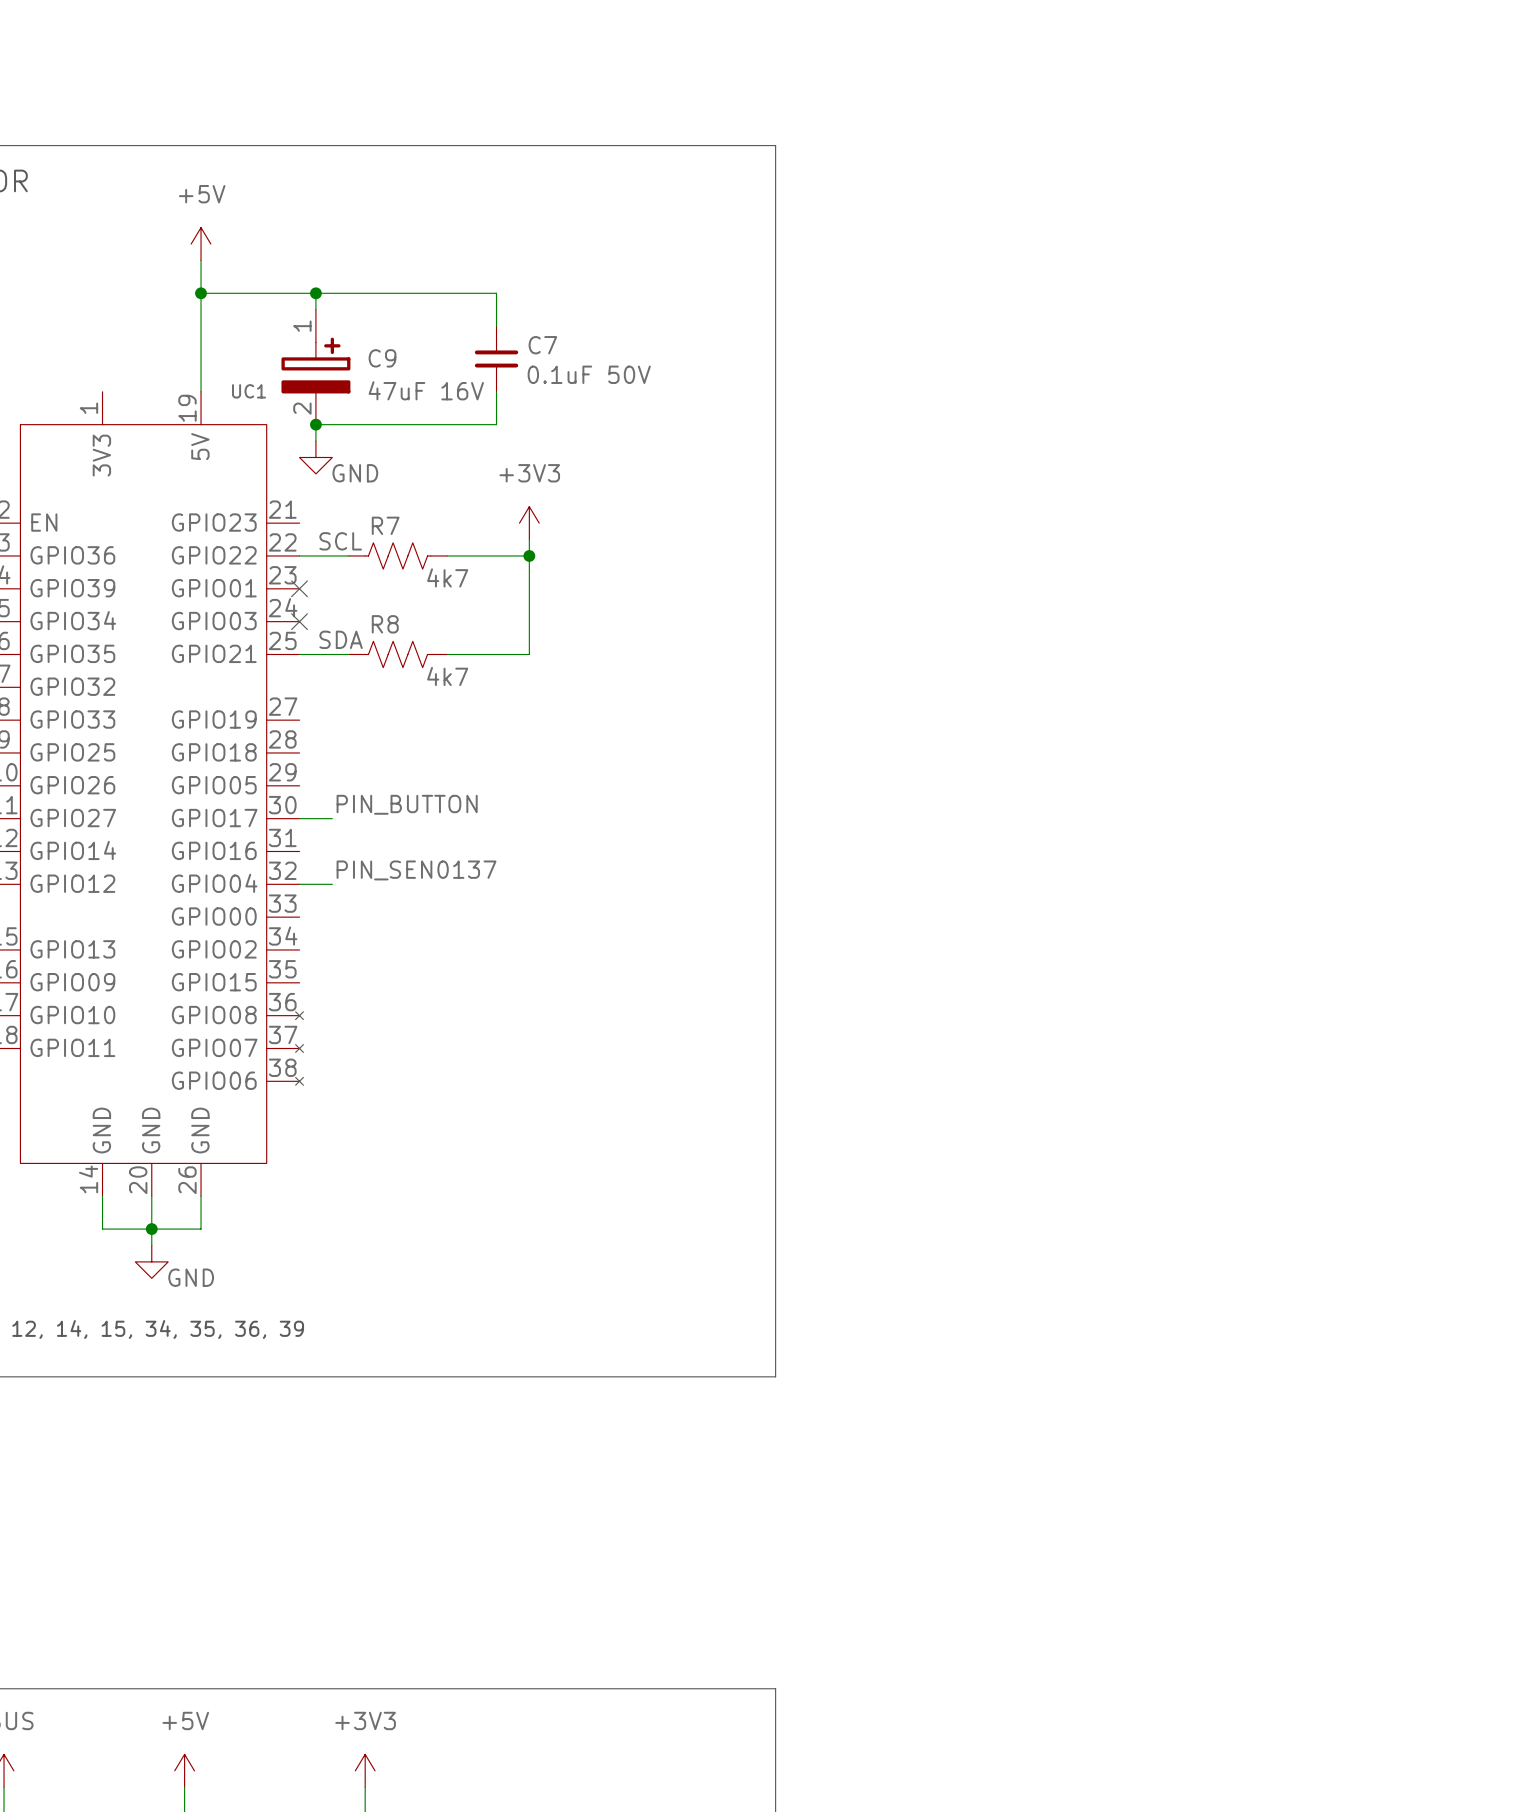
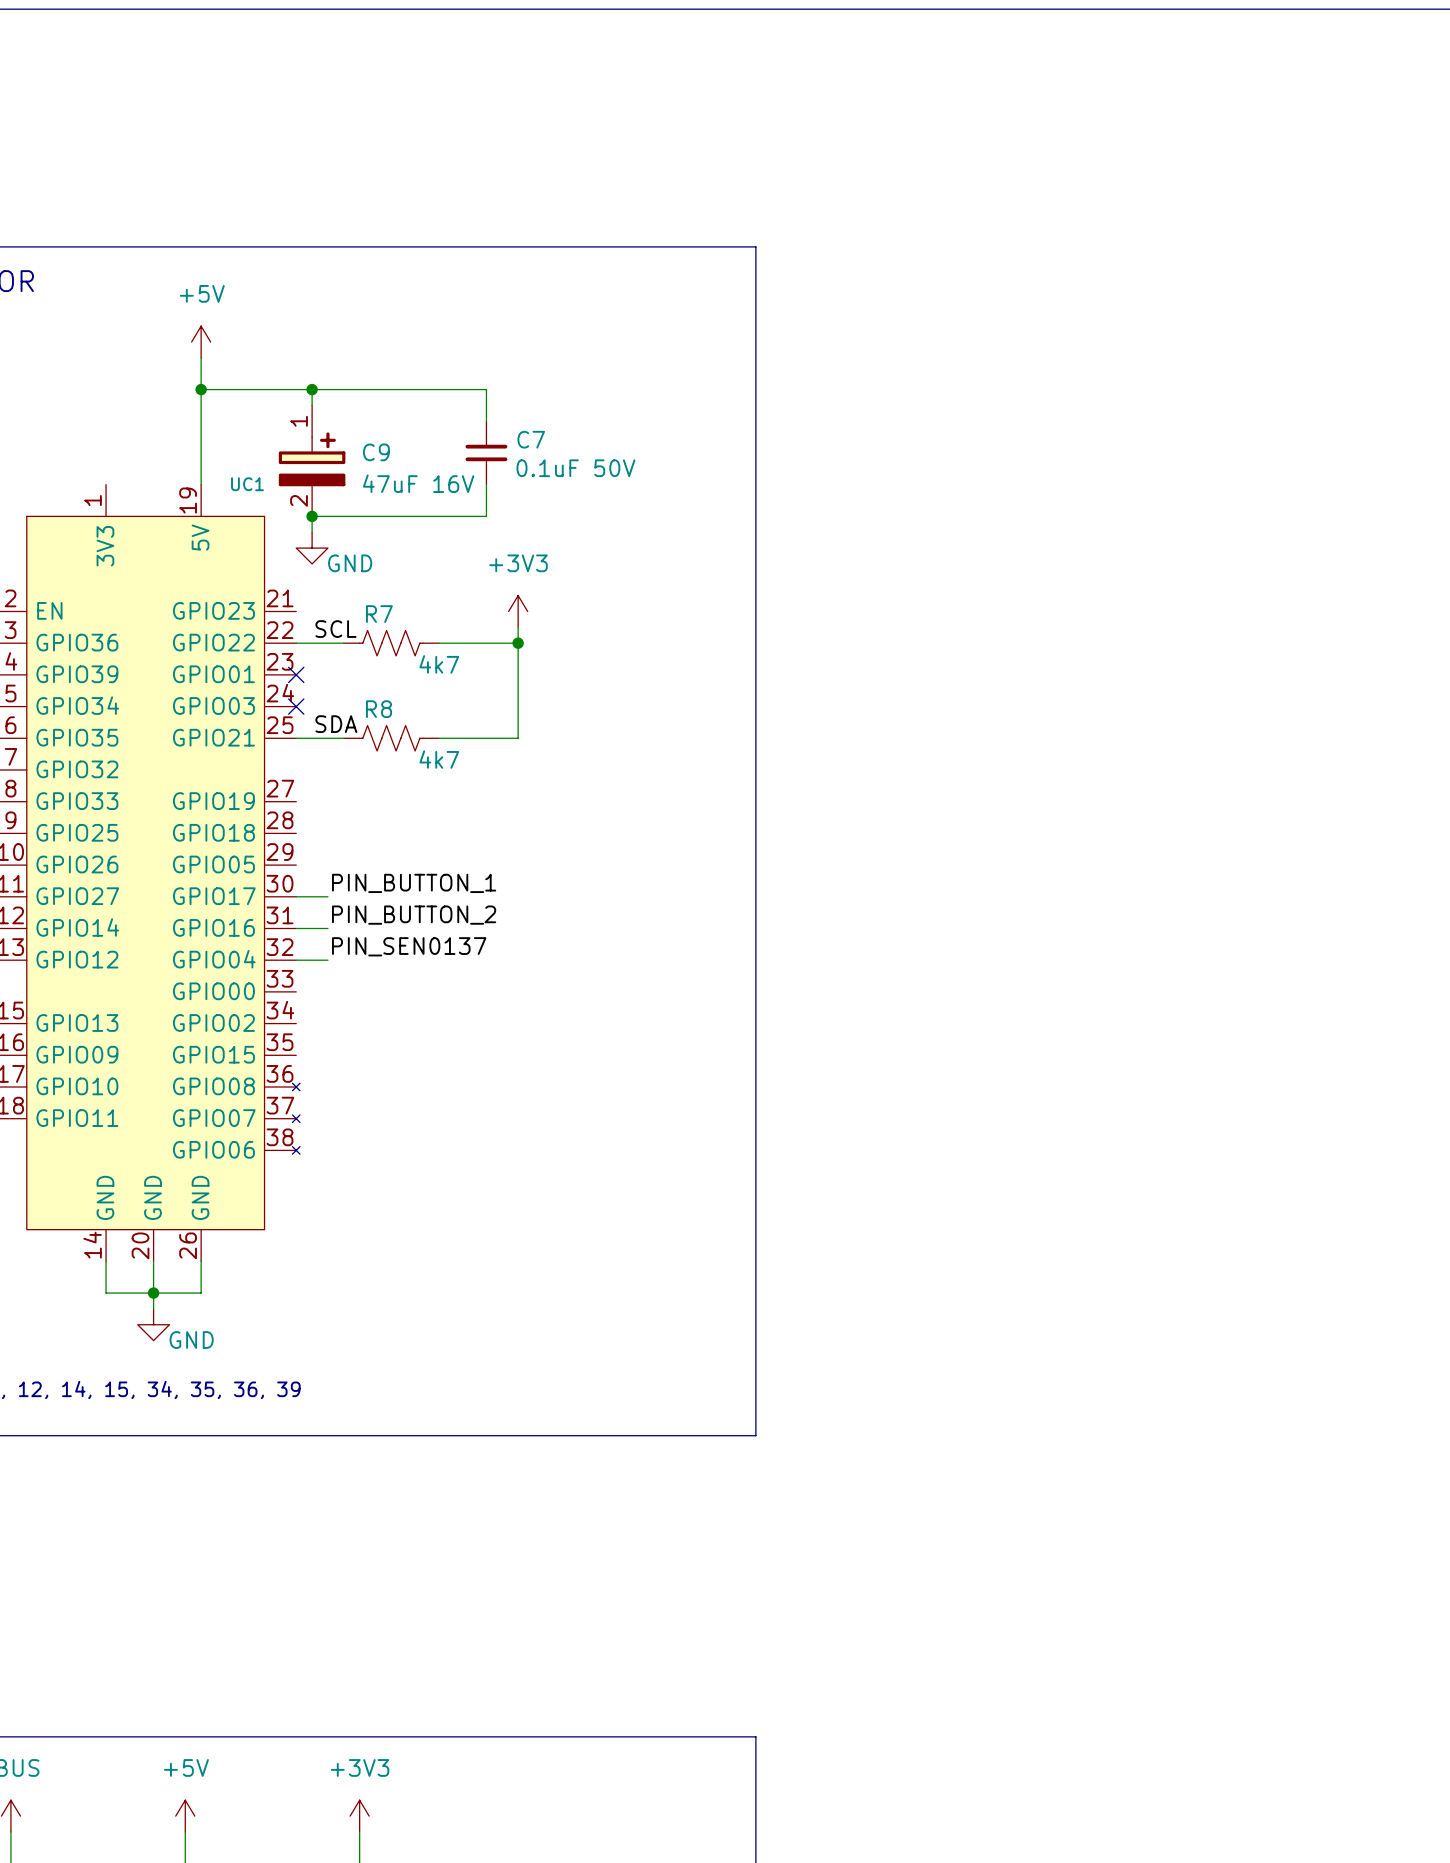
label: PIN_BUTTON (407, 804) -> PIN_BUTTON_1 (414, 883)
label: none -> PIN_BUTTON_2 (414, 915)
wire: none -> (296, 928) (327, 928)

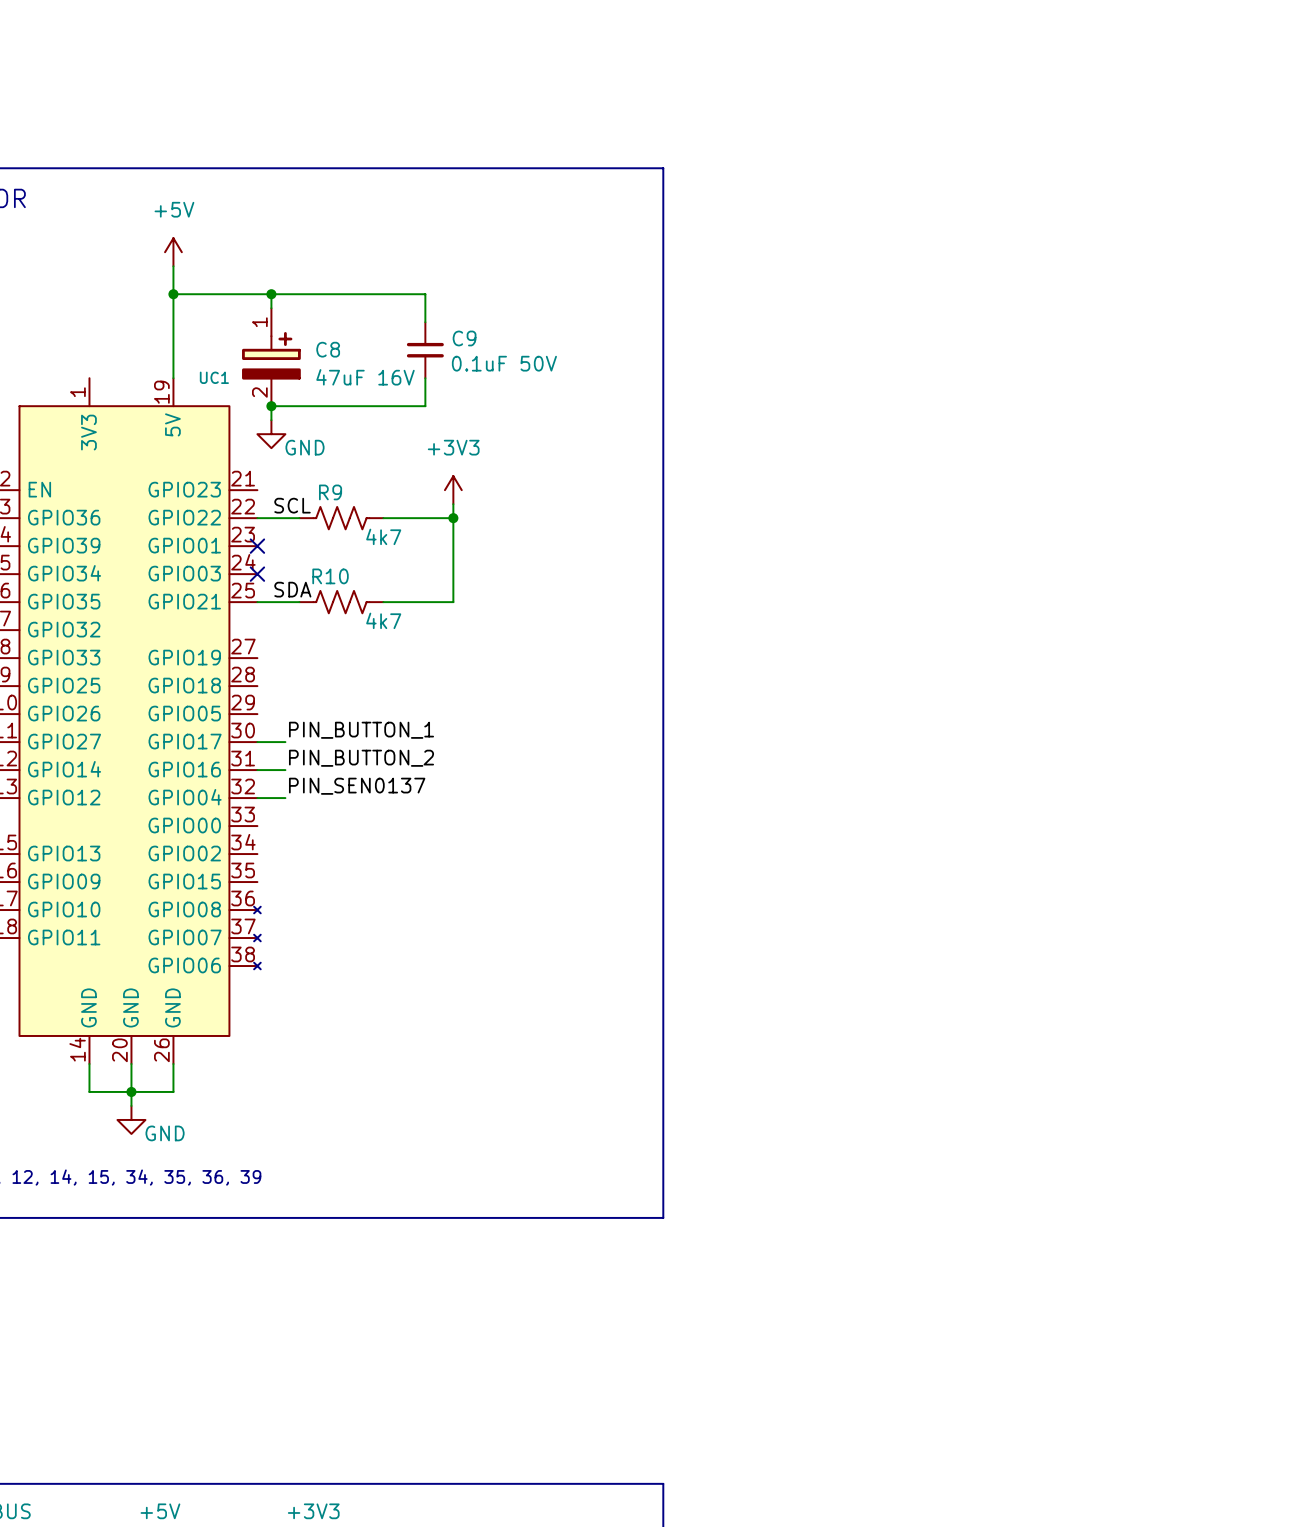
C7 name: C7 (531, 439) -> C9 (464, 338)
C9 name: C9 (376, 452) -> C8 (328, 349)
R7 name: R7 (379, 614) -> R9 (330, 492)
R8 name: R8 (379, 709) -> R10 (330, 576)

